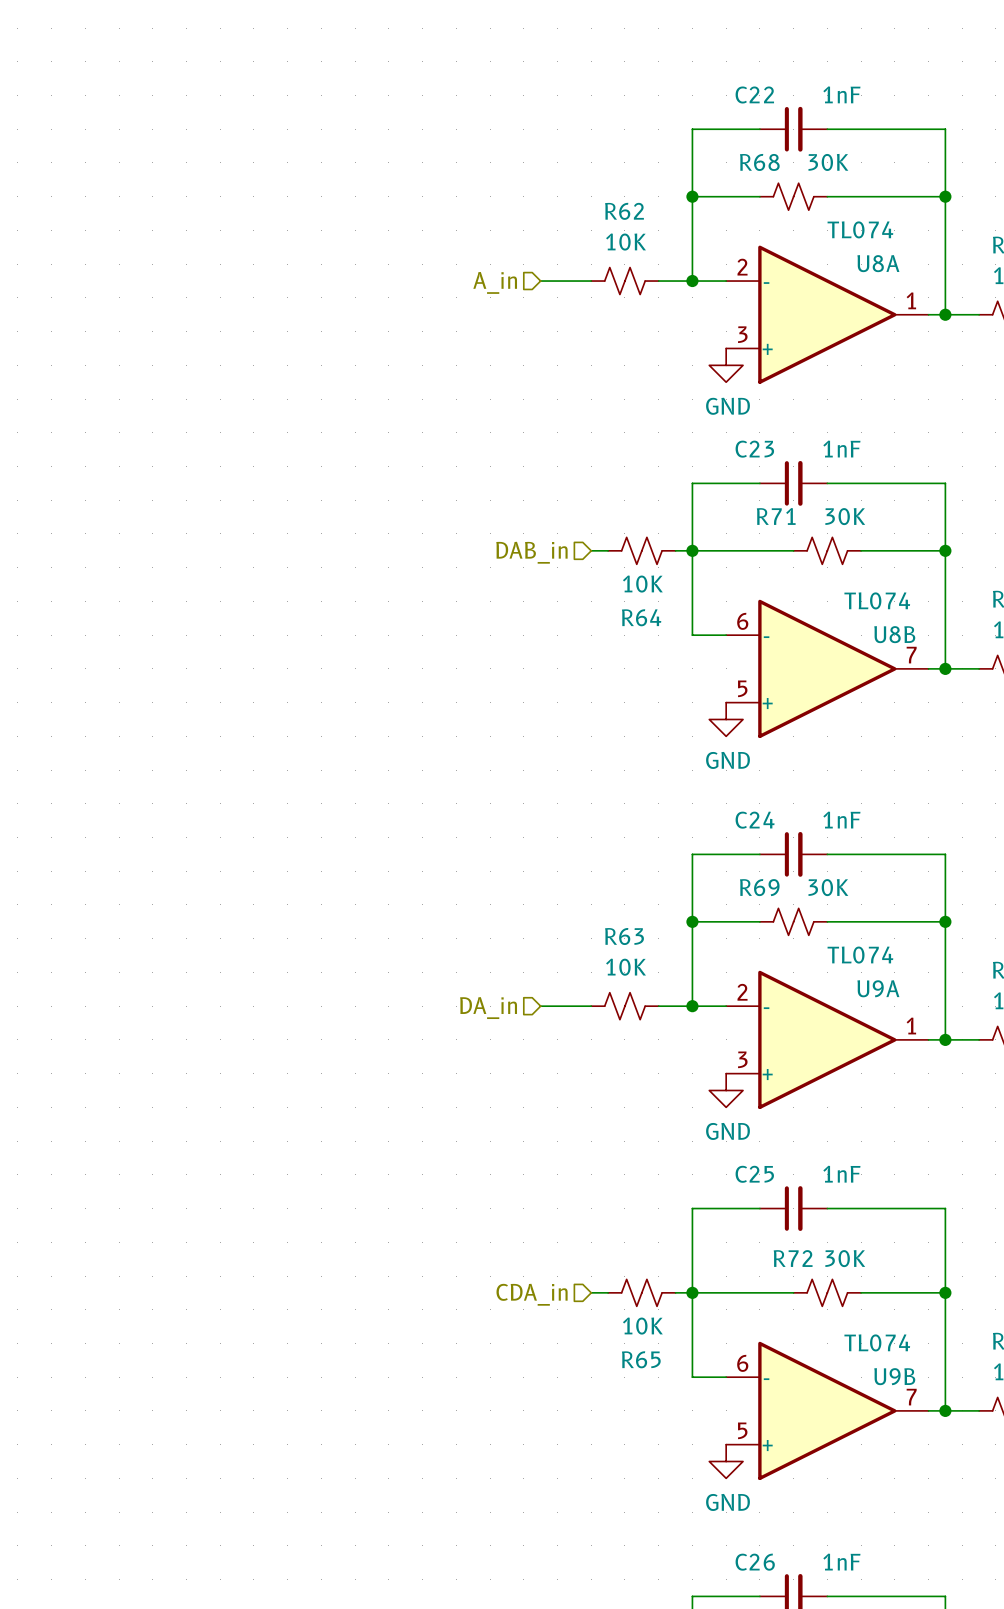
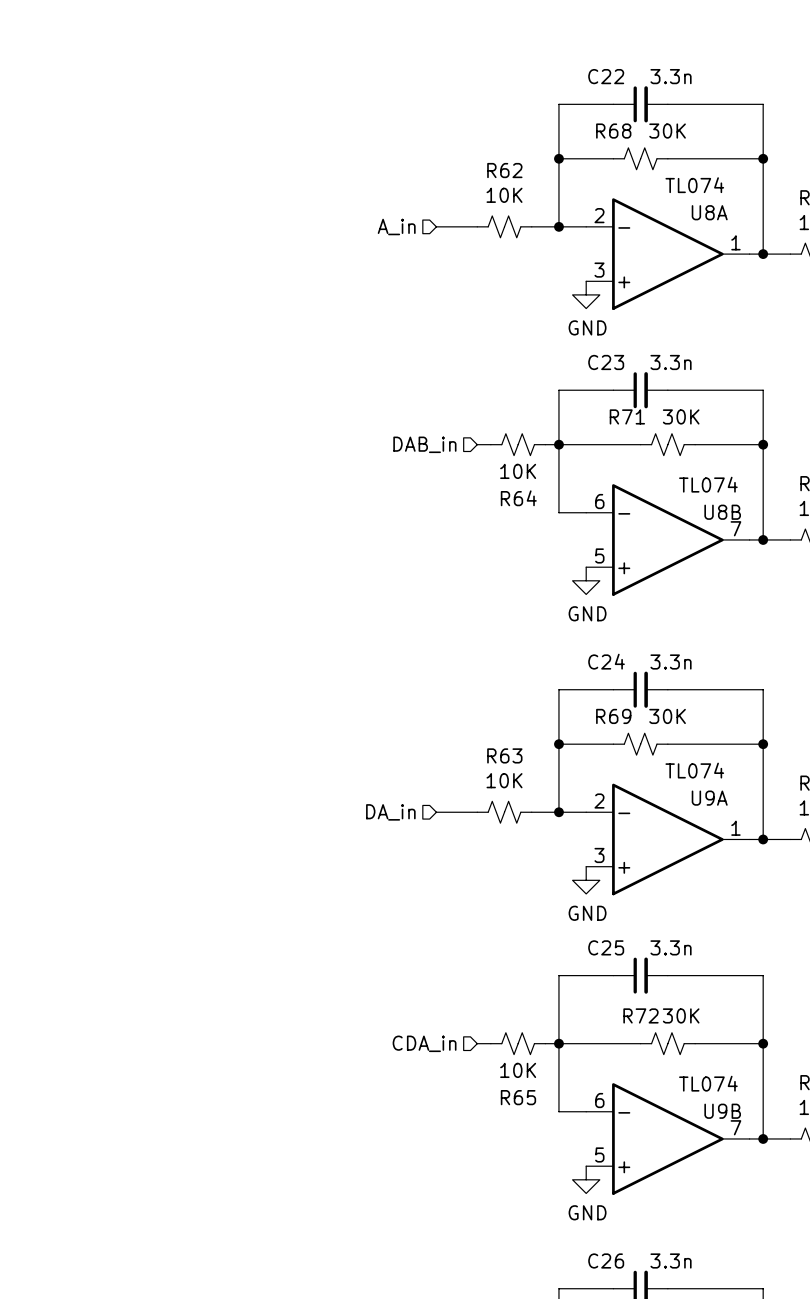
C22 value: 1nF (841, 94) -> 3.3n (671, 76)
C23 value: 1nF (841, 449) -> 3.3n (671, 362)
C24 value: 1nF (841, 820) -> 3.3n (671, 661)
C25 value: 1nF (841, 1174) -> 3.3n (671, 947)
C26 value: 1nF (841, 1562) -> 3.3n (671, 1260)

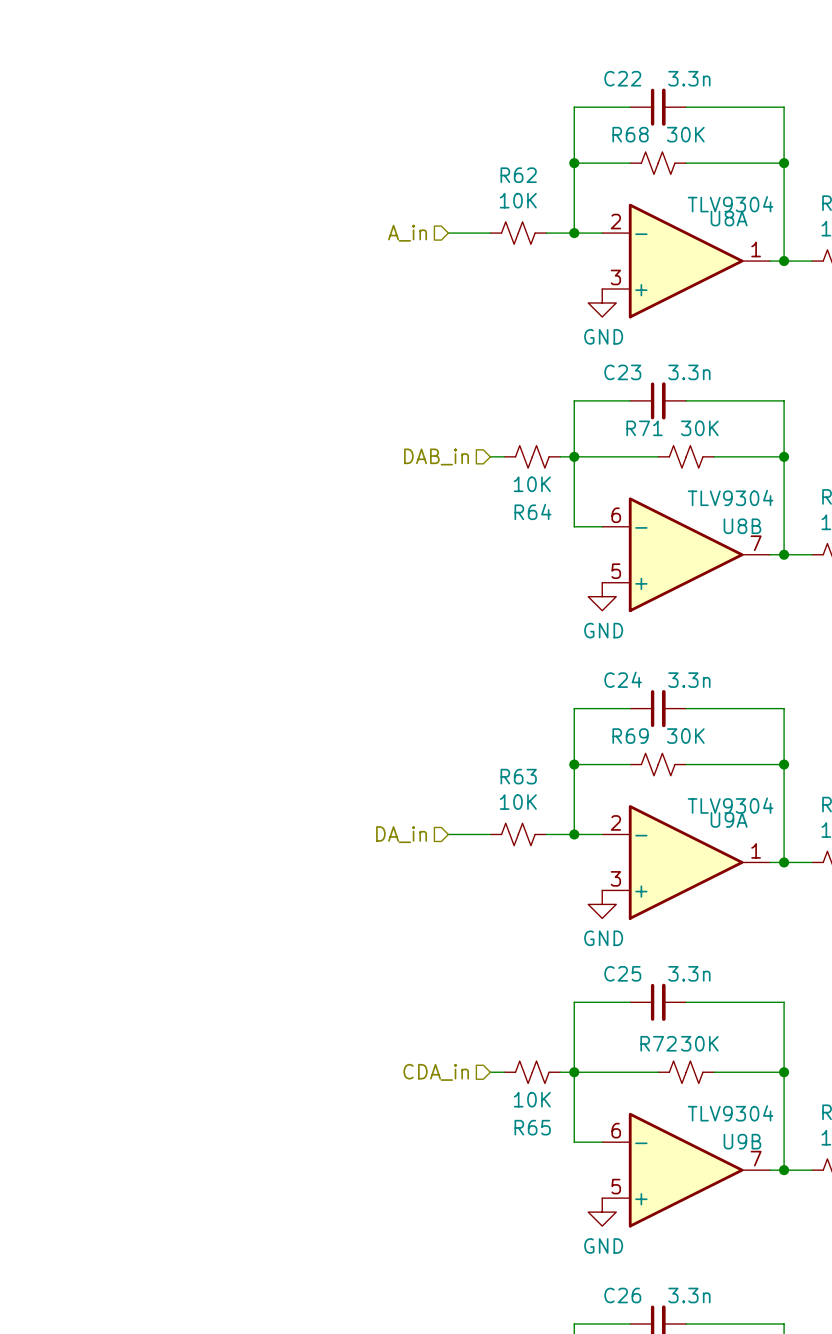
U8A value: TL074 (694, 185) -> TLV9304 (730, 204)
U8B value: TL074 (708, 484) -> TLV9304 (730, 497)
U9A value: TL074 (694, 770) -> TLV9304 (730, 805)
U9B value: TL074 (708, 1083) -> TLV9304 (730, 1113)

